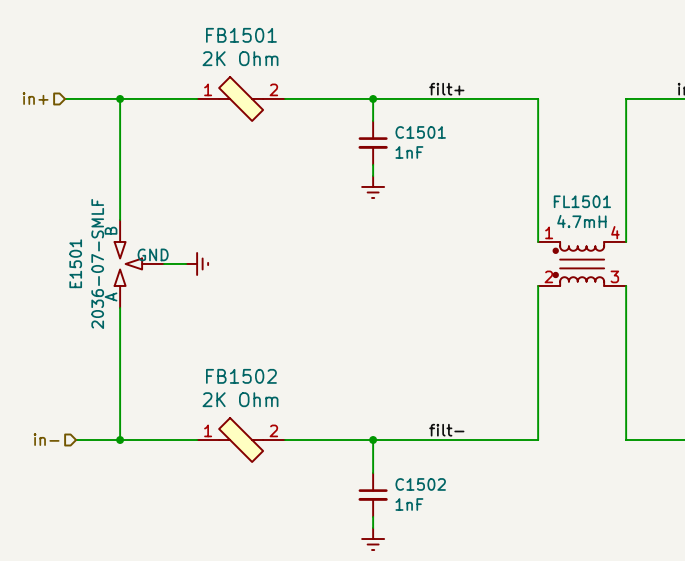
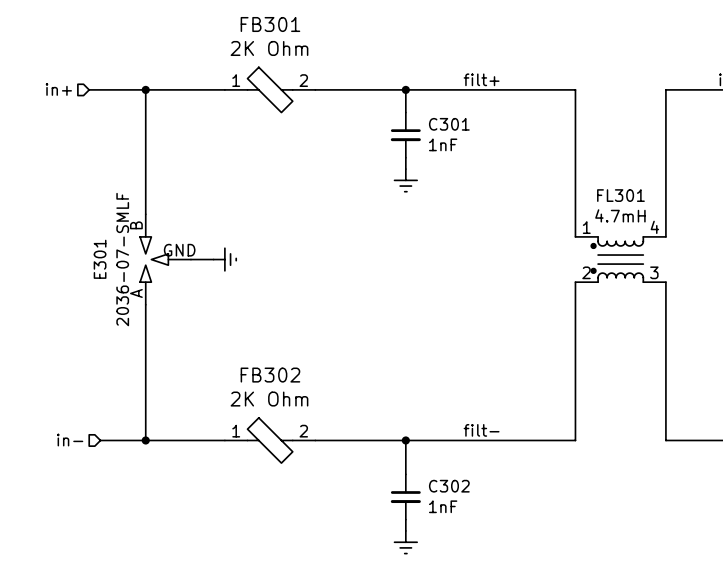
FB1501 name: FB1501 (241, 35) -> FB301 (270, 24)
C1501 name: C1501 (420, 132) -> C301 (449, 124)
FL1501 name: FL1501 (582, 201) -> FL301 (620, 195)
E1501 name: E1501 (75, 263) -> E301 (100, 259)
FB1502 name: FB1502 (241, 376) -> FB302 (270, 375)
C1502 name: C1502 (420, 484) -> C302 (449, 486)

